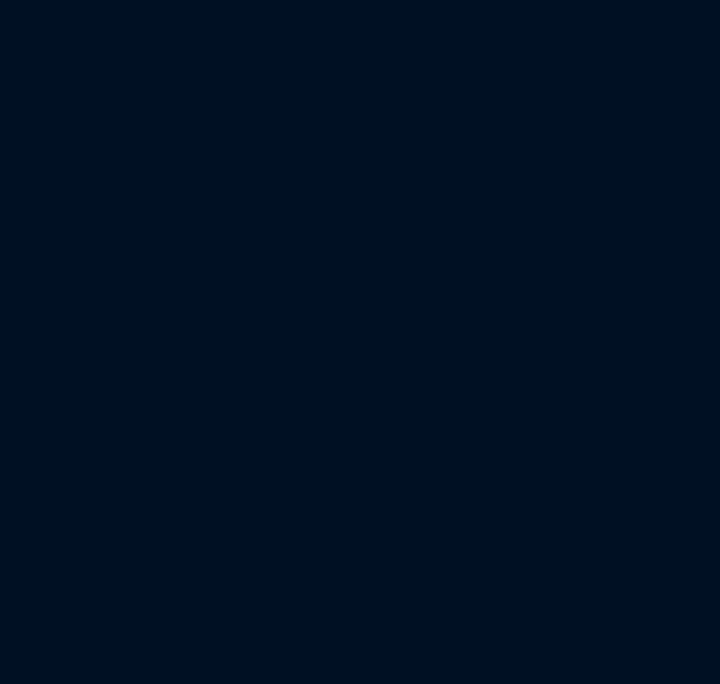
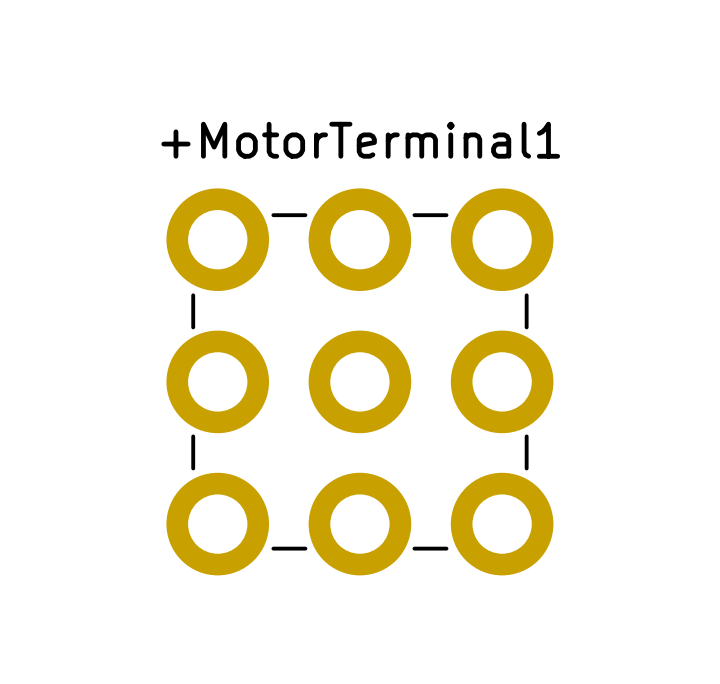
+MotorTerminal1: none -> (359, 381)

